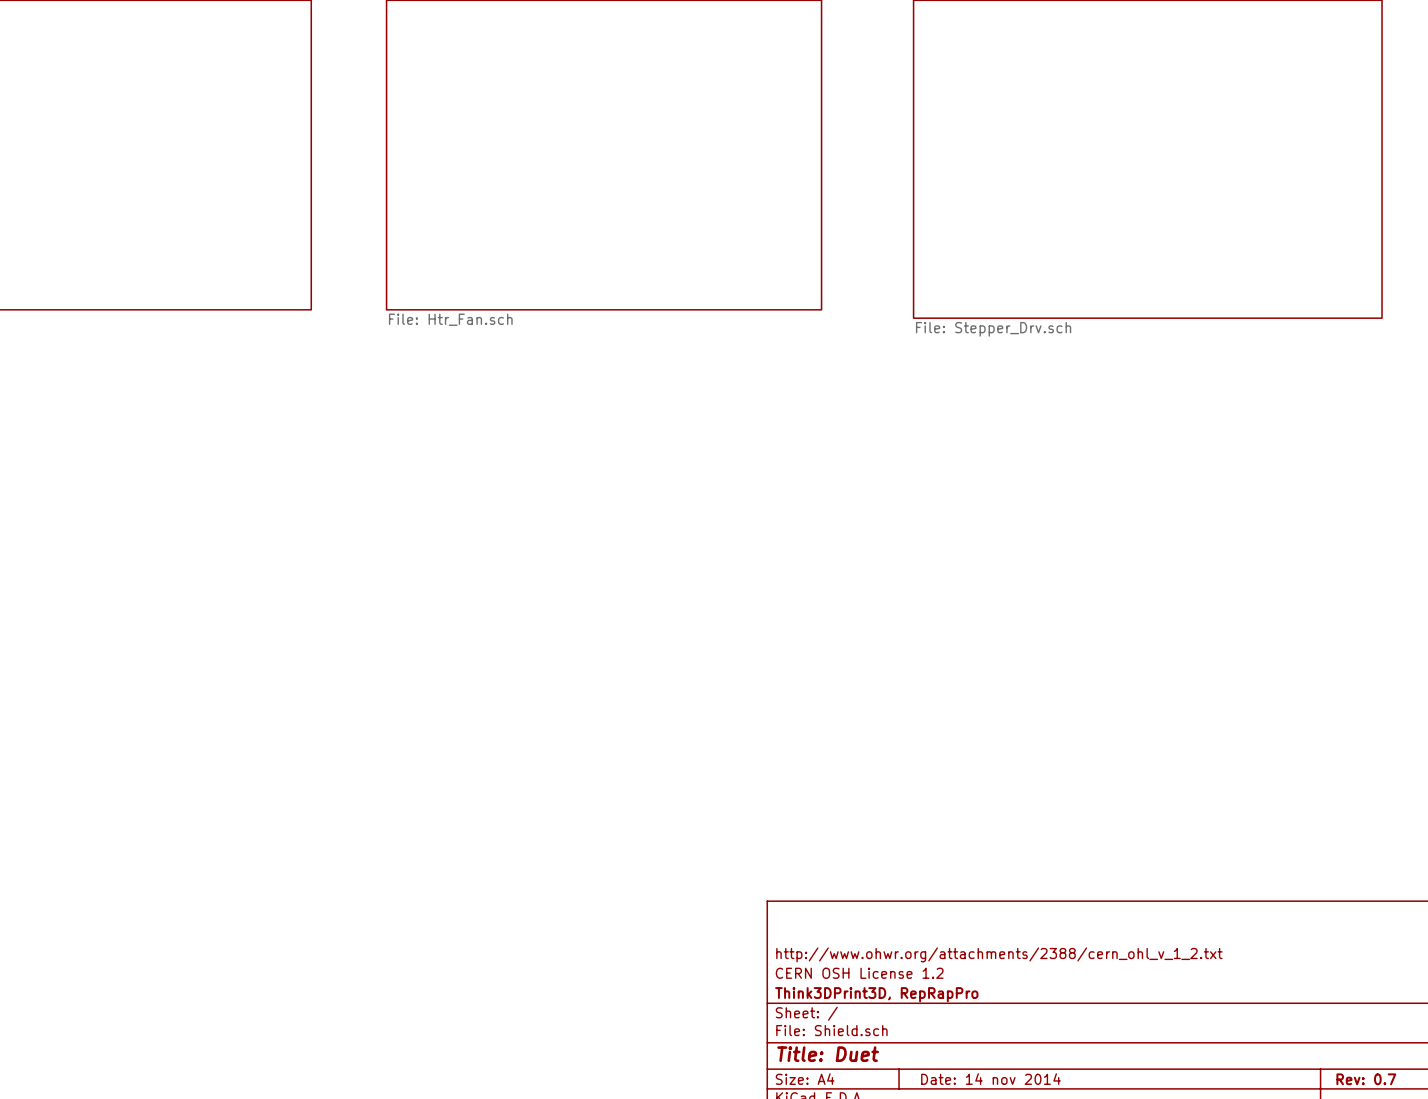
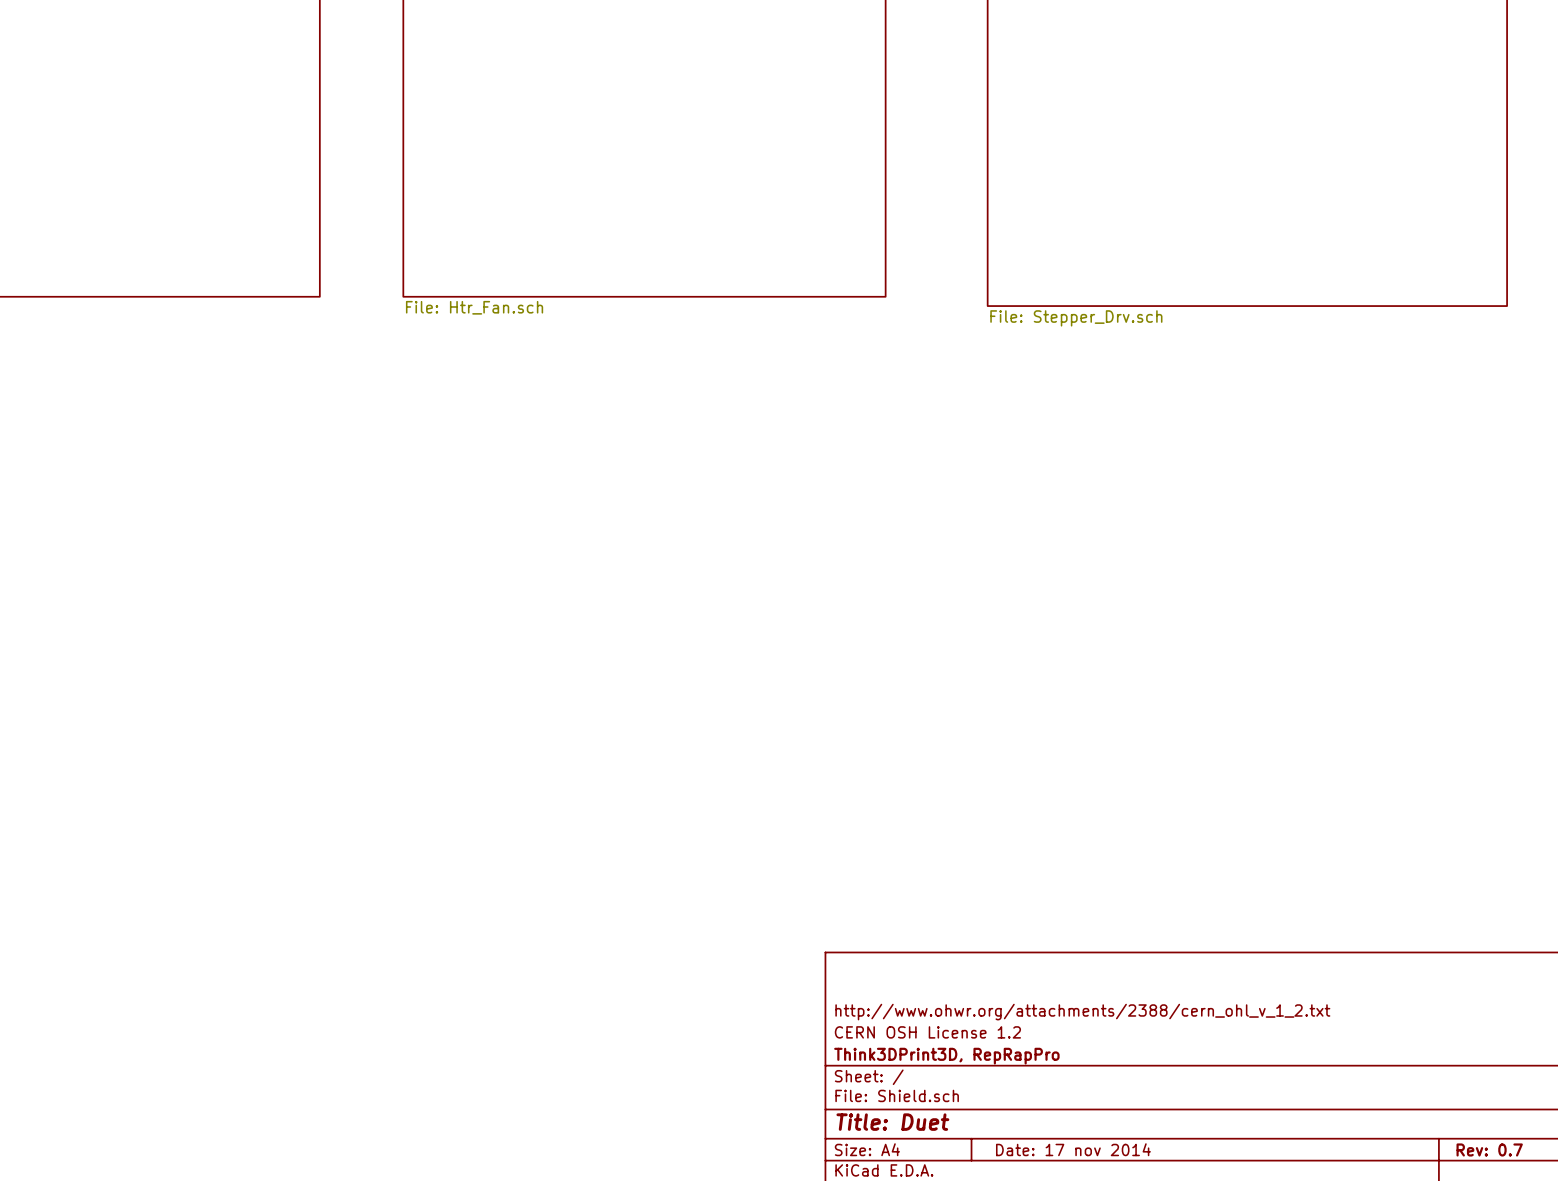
title block: Date: 14 nov 2014 (990, 1079) -> Date: 17 nov 2014 (1073, 1149)

